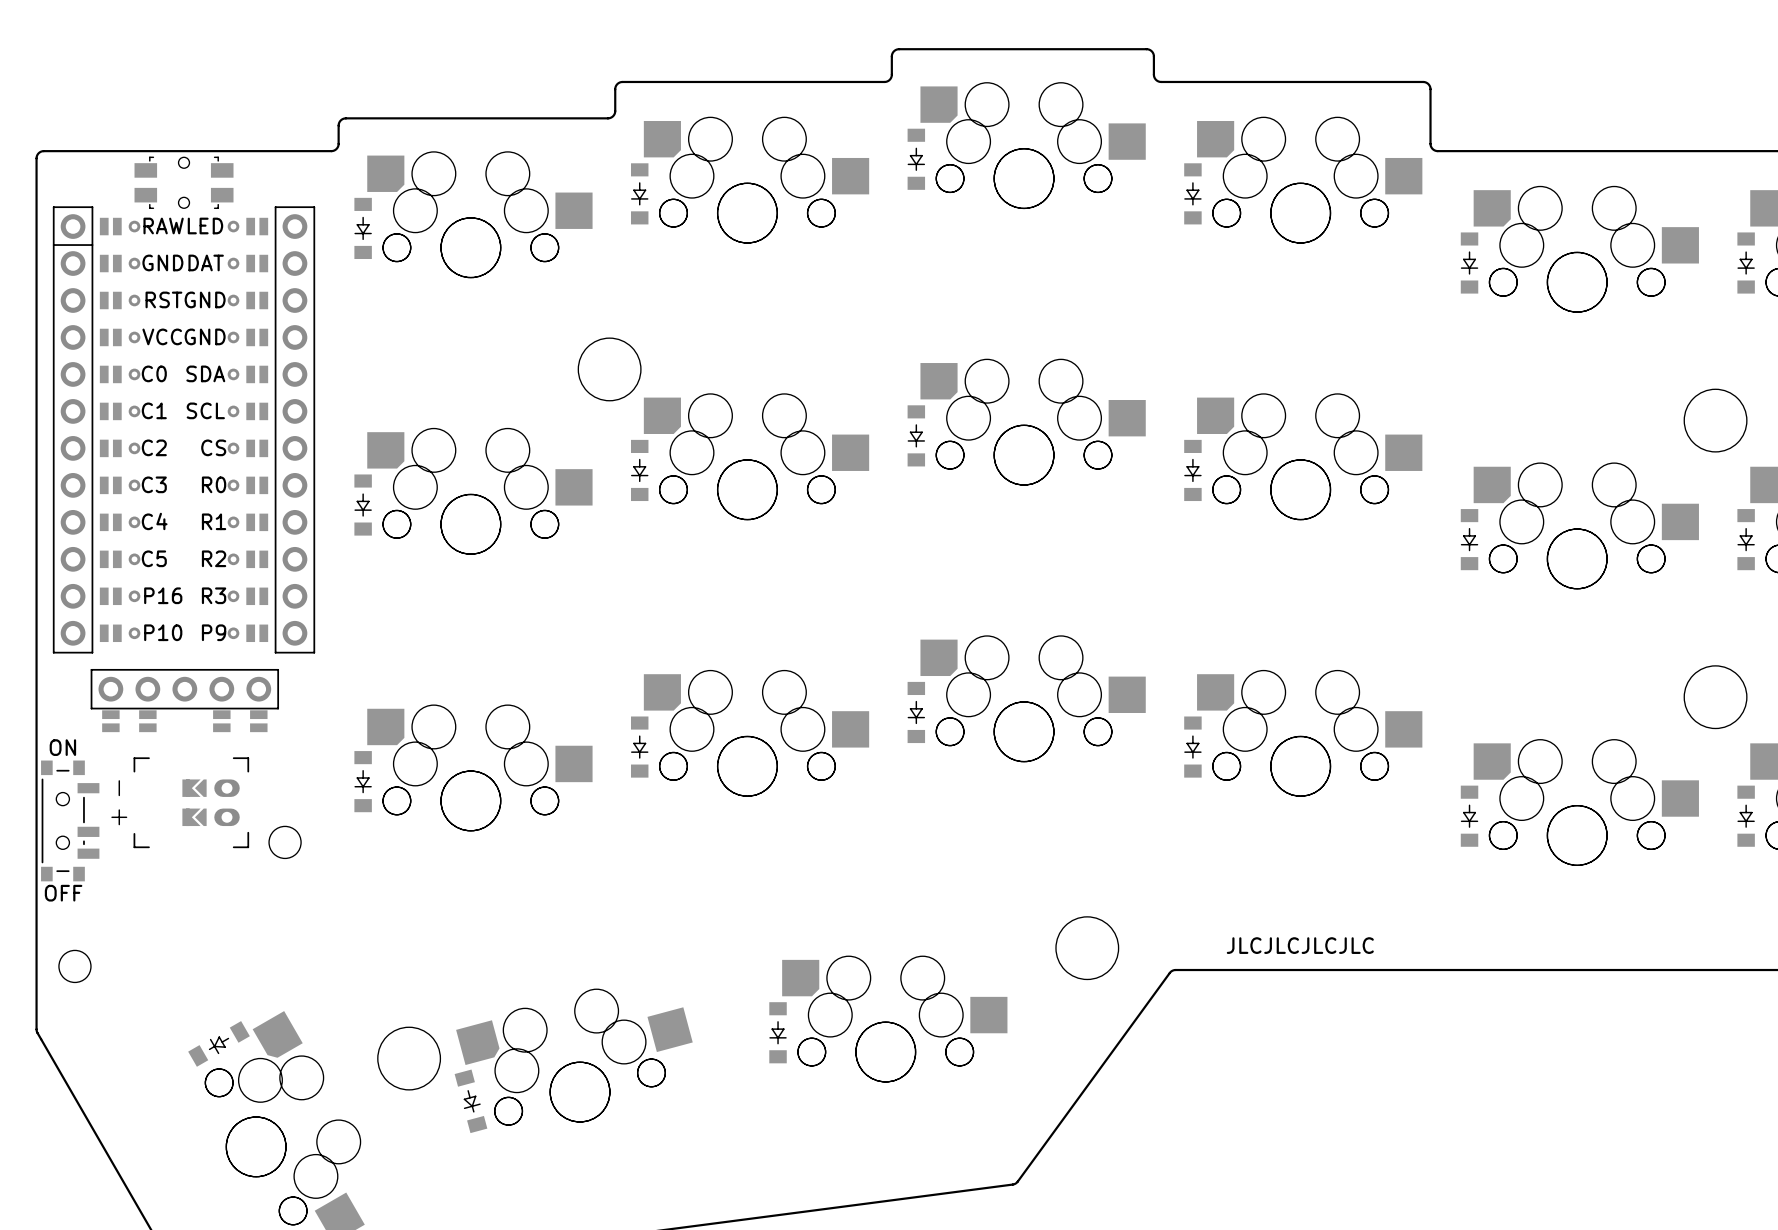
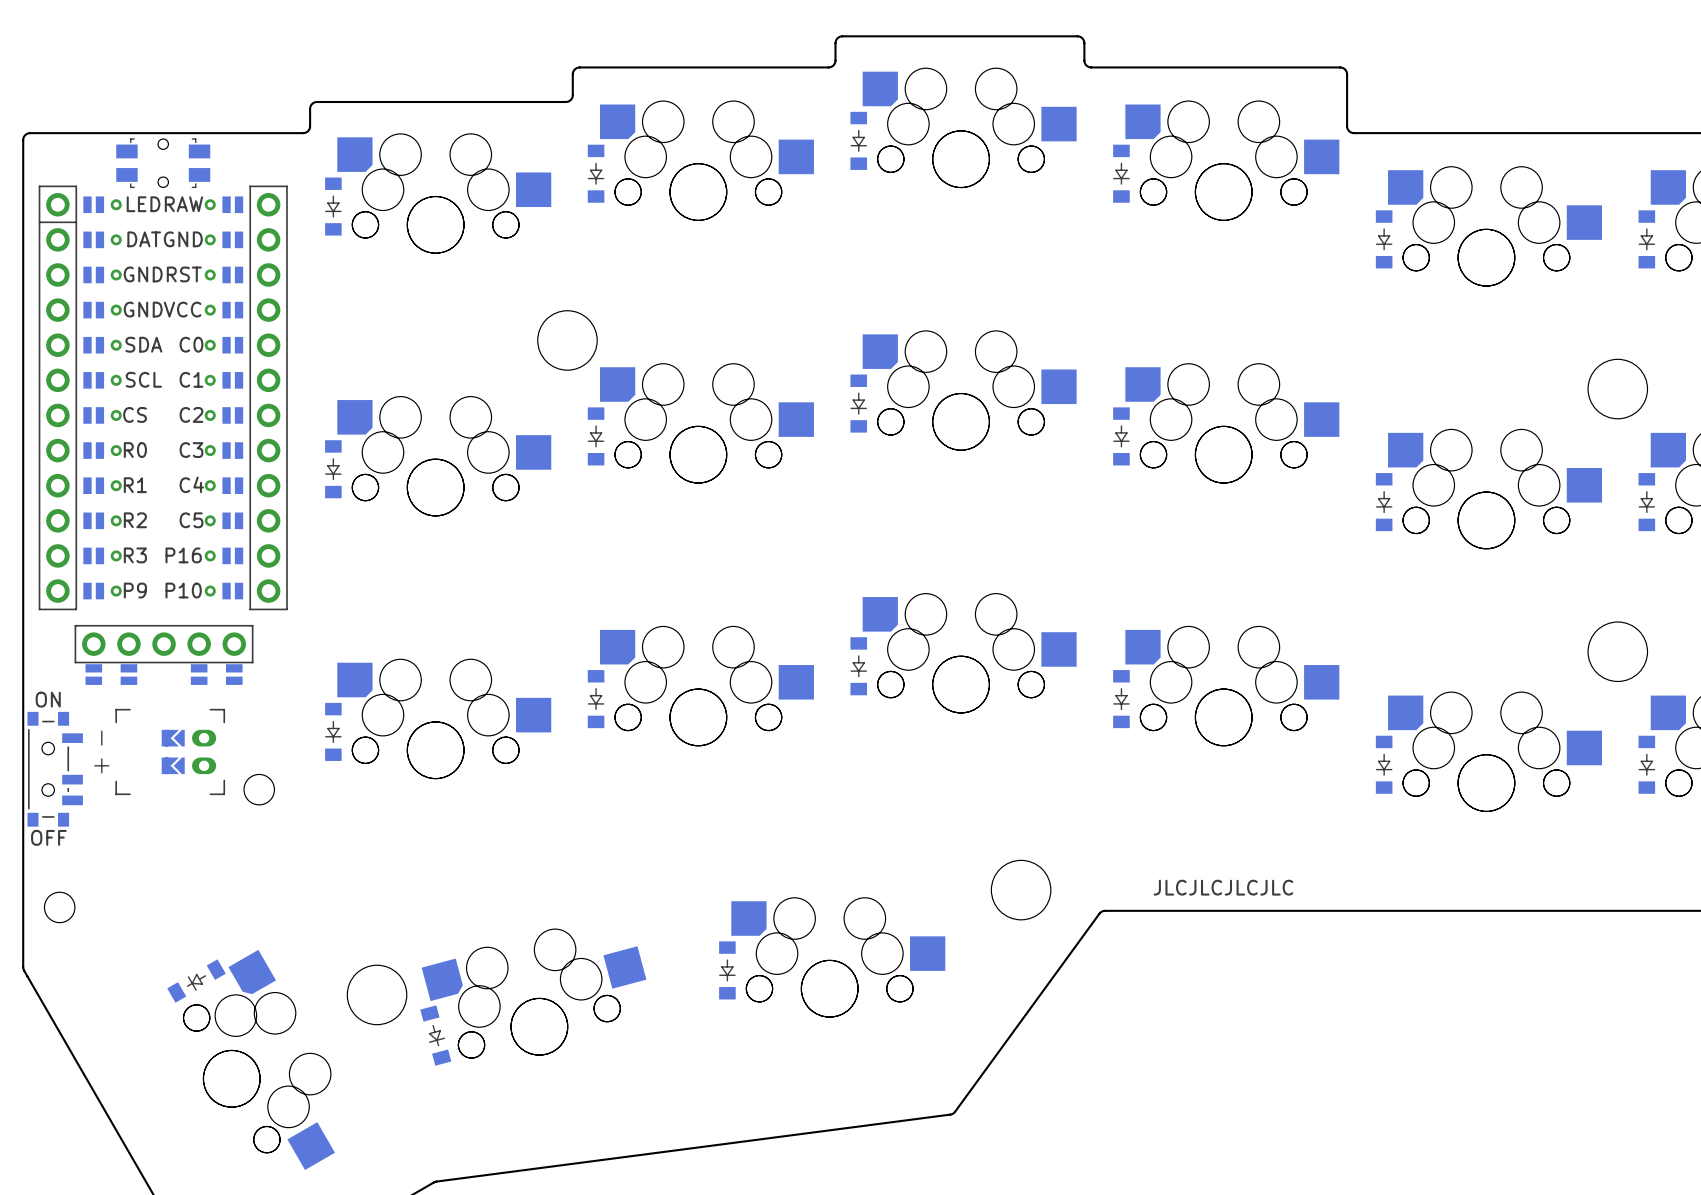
part footprint: [52, 206, 316, 654] -> [38, 185, 288, 611]

